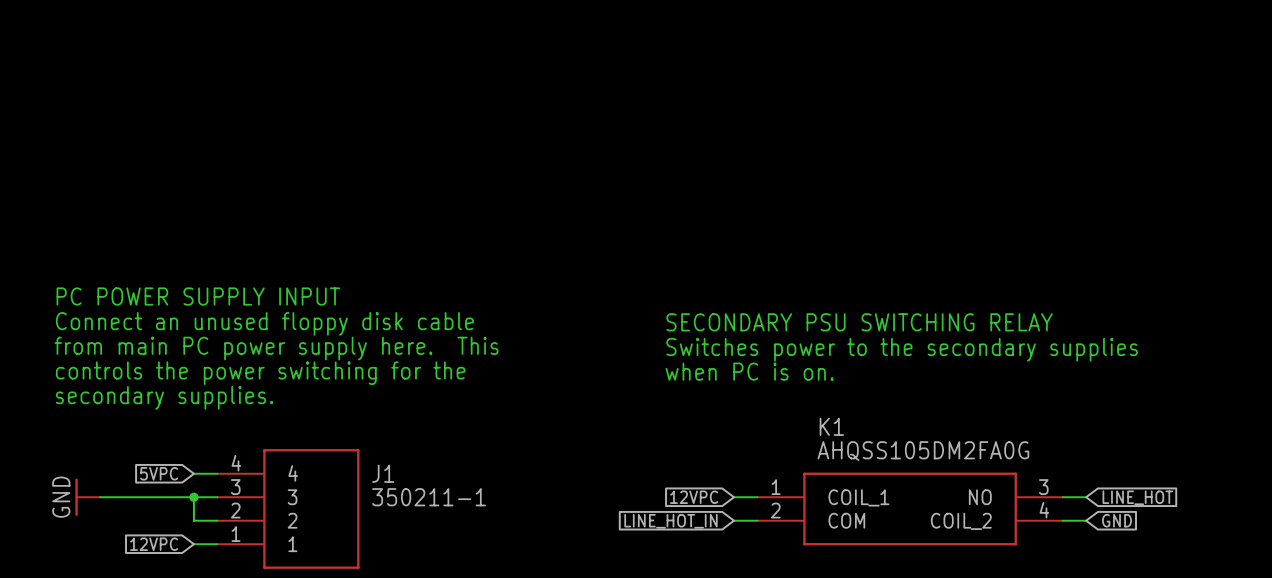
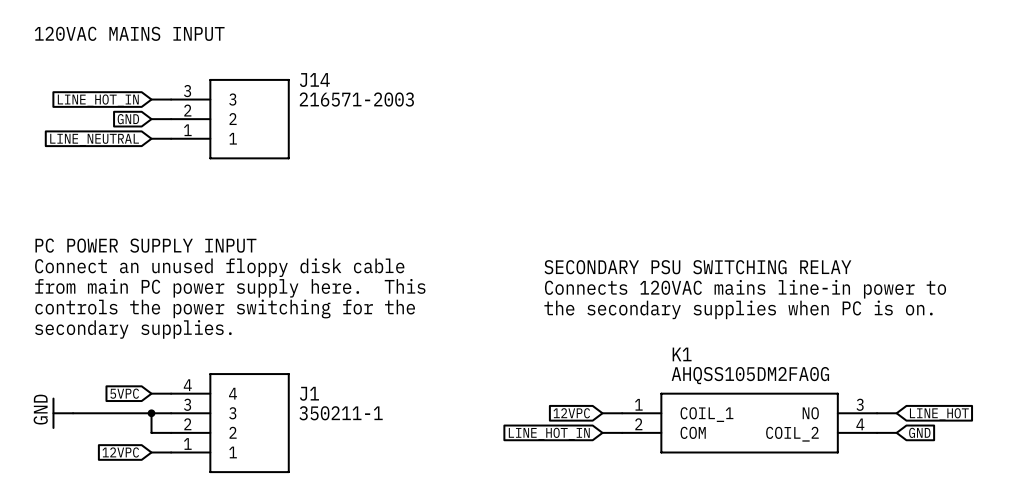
text: none -> 120VAC MAINS INPUT (129, 33)
wire: none -> (151, 99) (171, 99)
global label: none -> LINE_HOT_IN (98, 100)
global label: none -> GND (128, 119)
wire: none -> (151, 119) (171, 119)
J14: none -> 216571-2003 (230, 119)
wire: none -> (151, 138) (171, 138)
global label: none -> LINE_NEUTRAL (94, 139)
text: Switches power to the secondary supplies (902, 349) -> Connects 120VAC mains line-in power to (745, 289)
text: when PC is on. (749, 371) -> the secondary supplies when PC is on. (738, 309)

